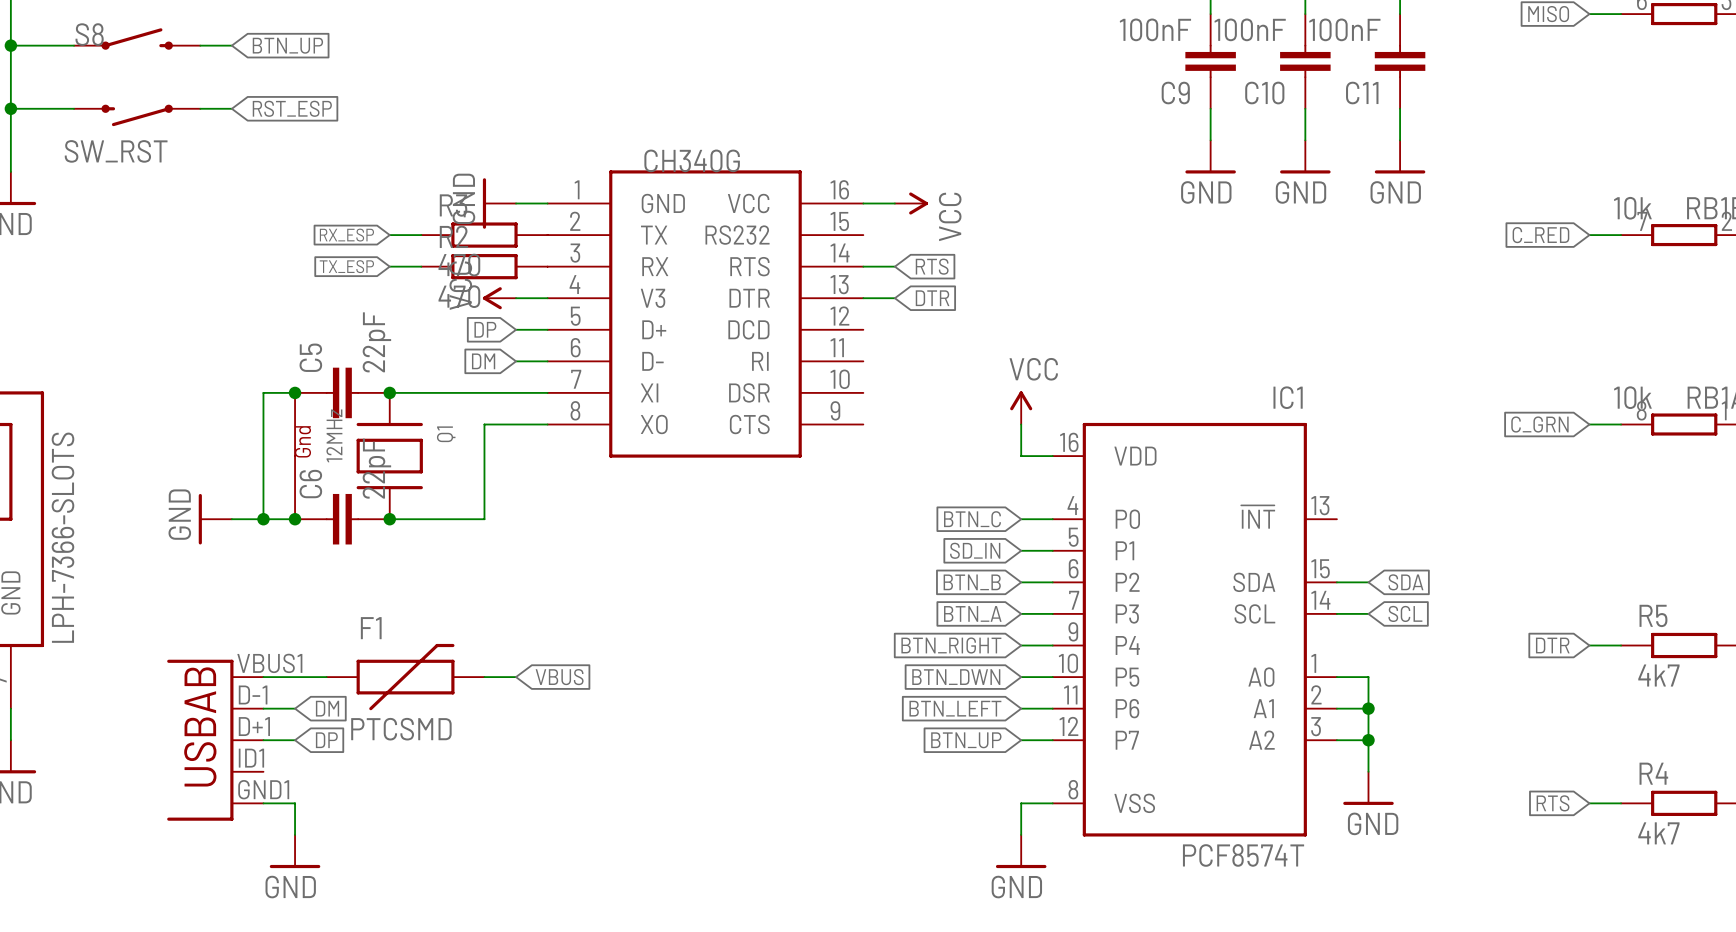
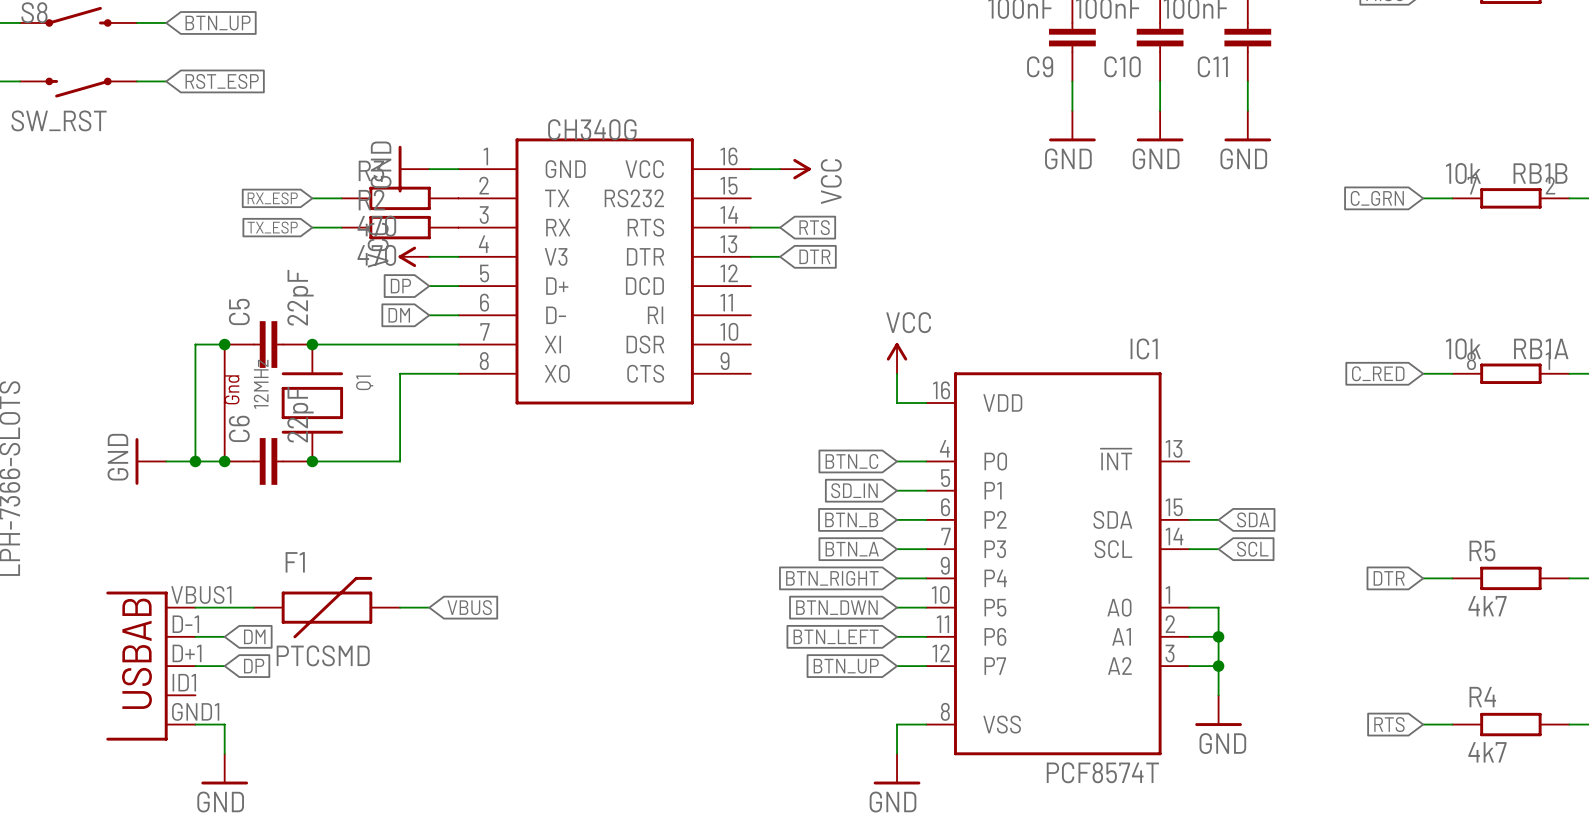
global label: C_RED (1540, 235) -> C_GRN (1377, 198)
global label: C_GRN (1539, 424) -> C_RED (1378, 373)

